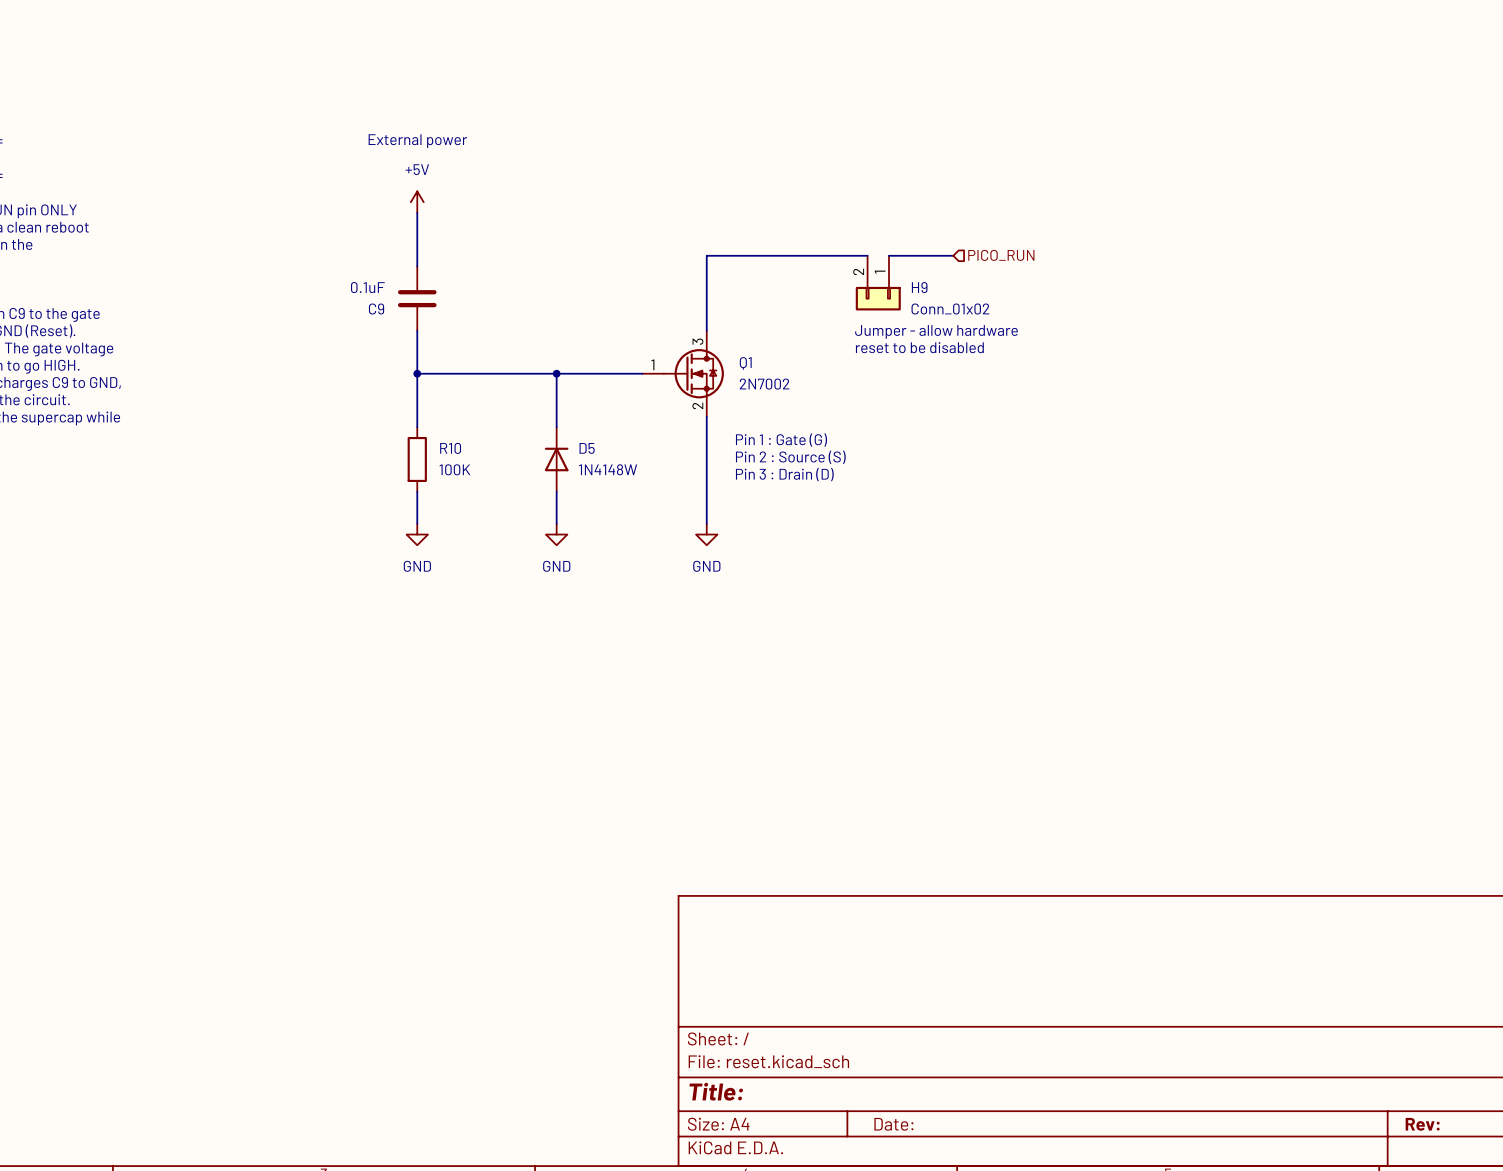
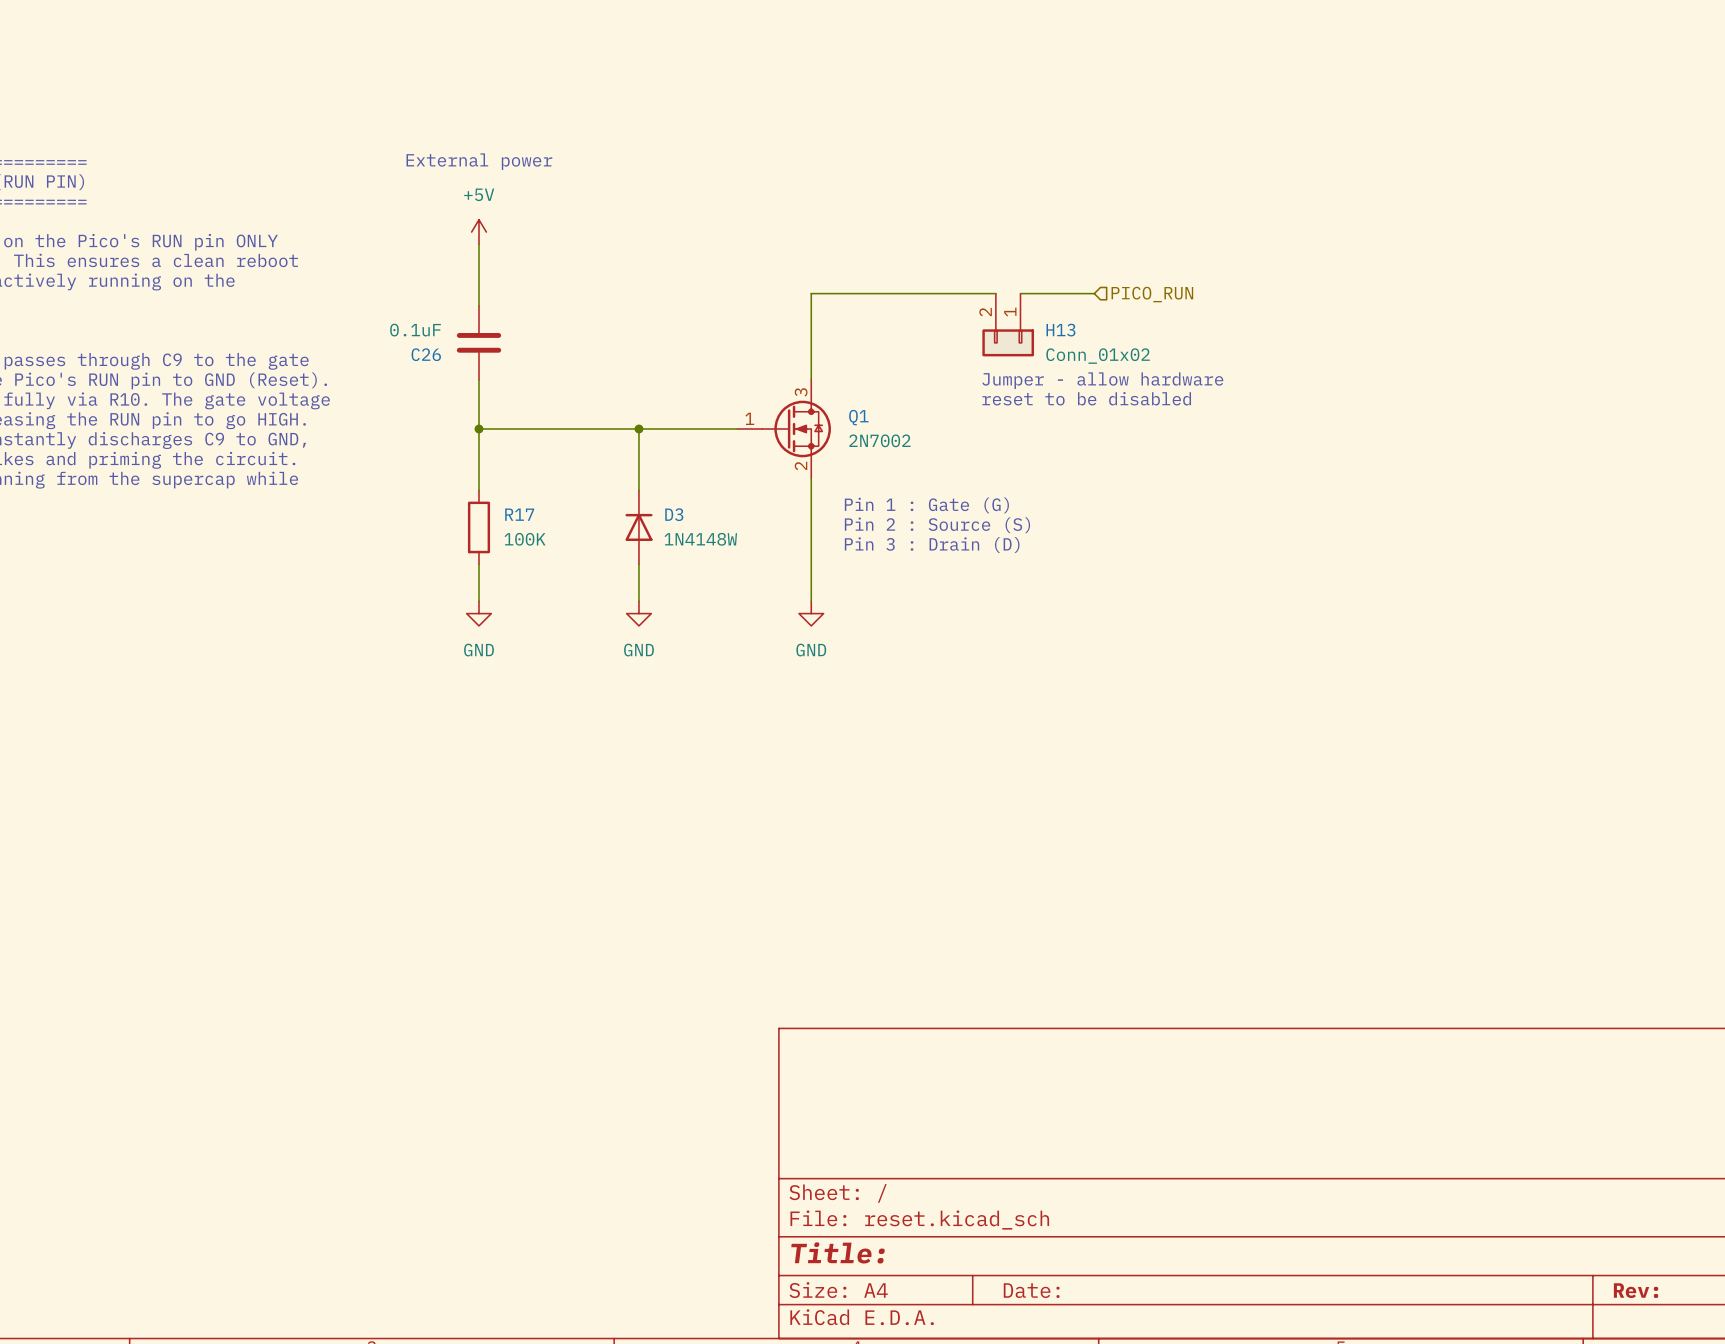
H9 name: H9 (919, 287) -> H13 (1060, 330)
C9 name: C9 (376, 309) -> C26 (426, 354)
R10 name: R10 (450, 448) -> R17 (519, 514)
D5 name: D5 (587, 448) -> D3 (674, 514)

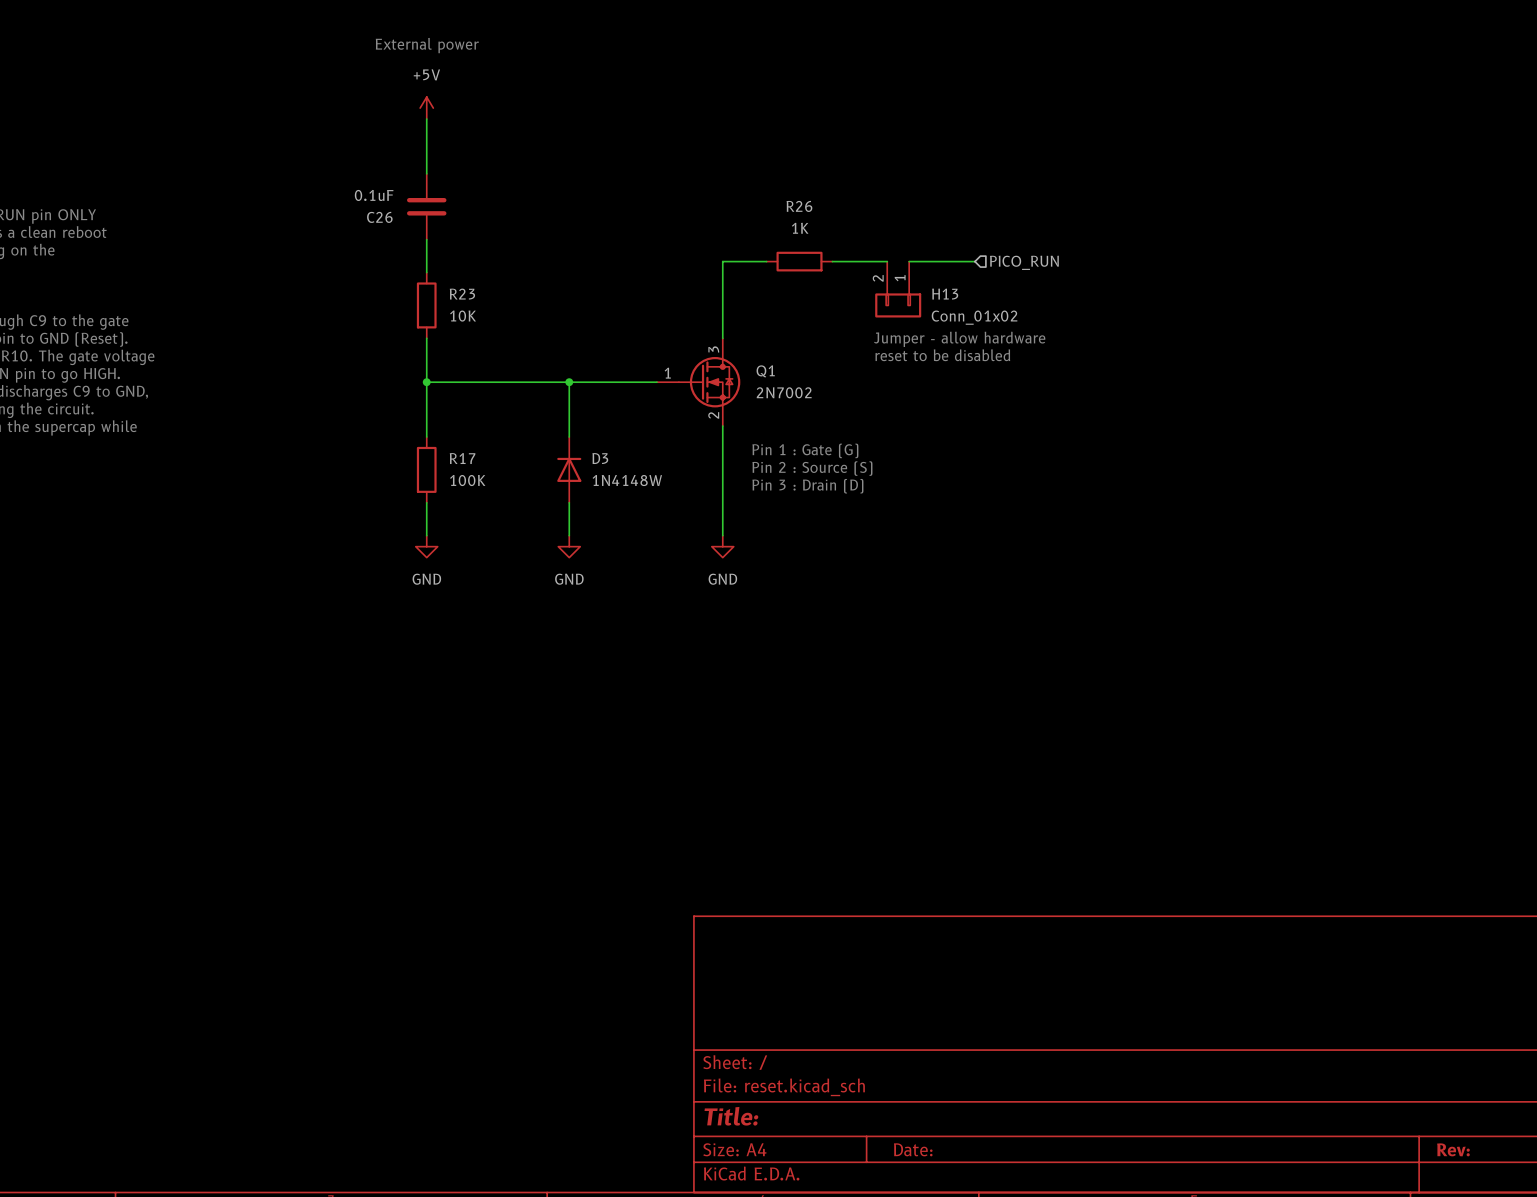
wire: none -> (426, 119) (426, 173)
text position: External power (479, 161) -> External power (427, 45)
power symbol position: +5V (478, 232) -> +5V (426, 108)
wire: (860, 293) (934, 293) -> none
R26: none -> 1K (799, 261)
C26 position: (478, 342) -> (426, 206)
R23: none -> 10K (426, 305)

